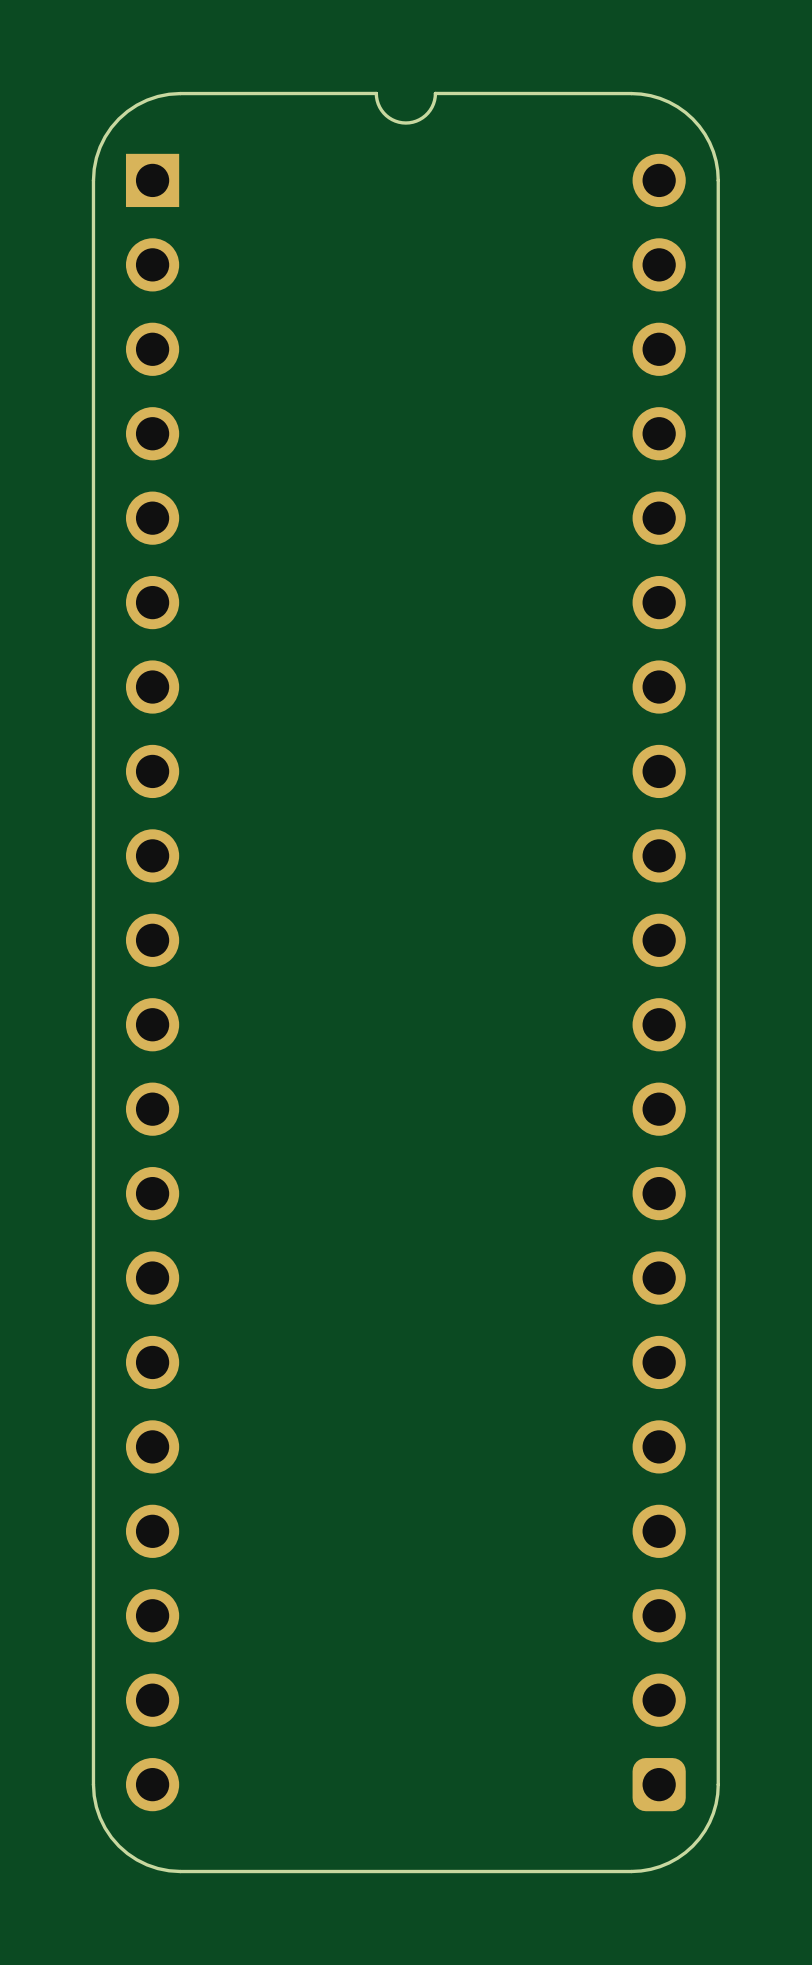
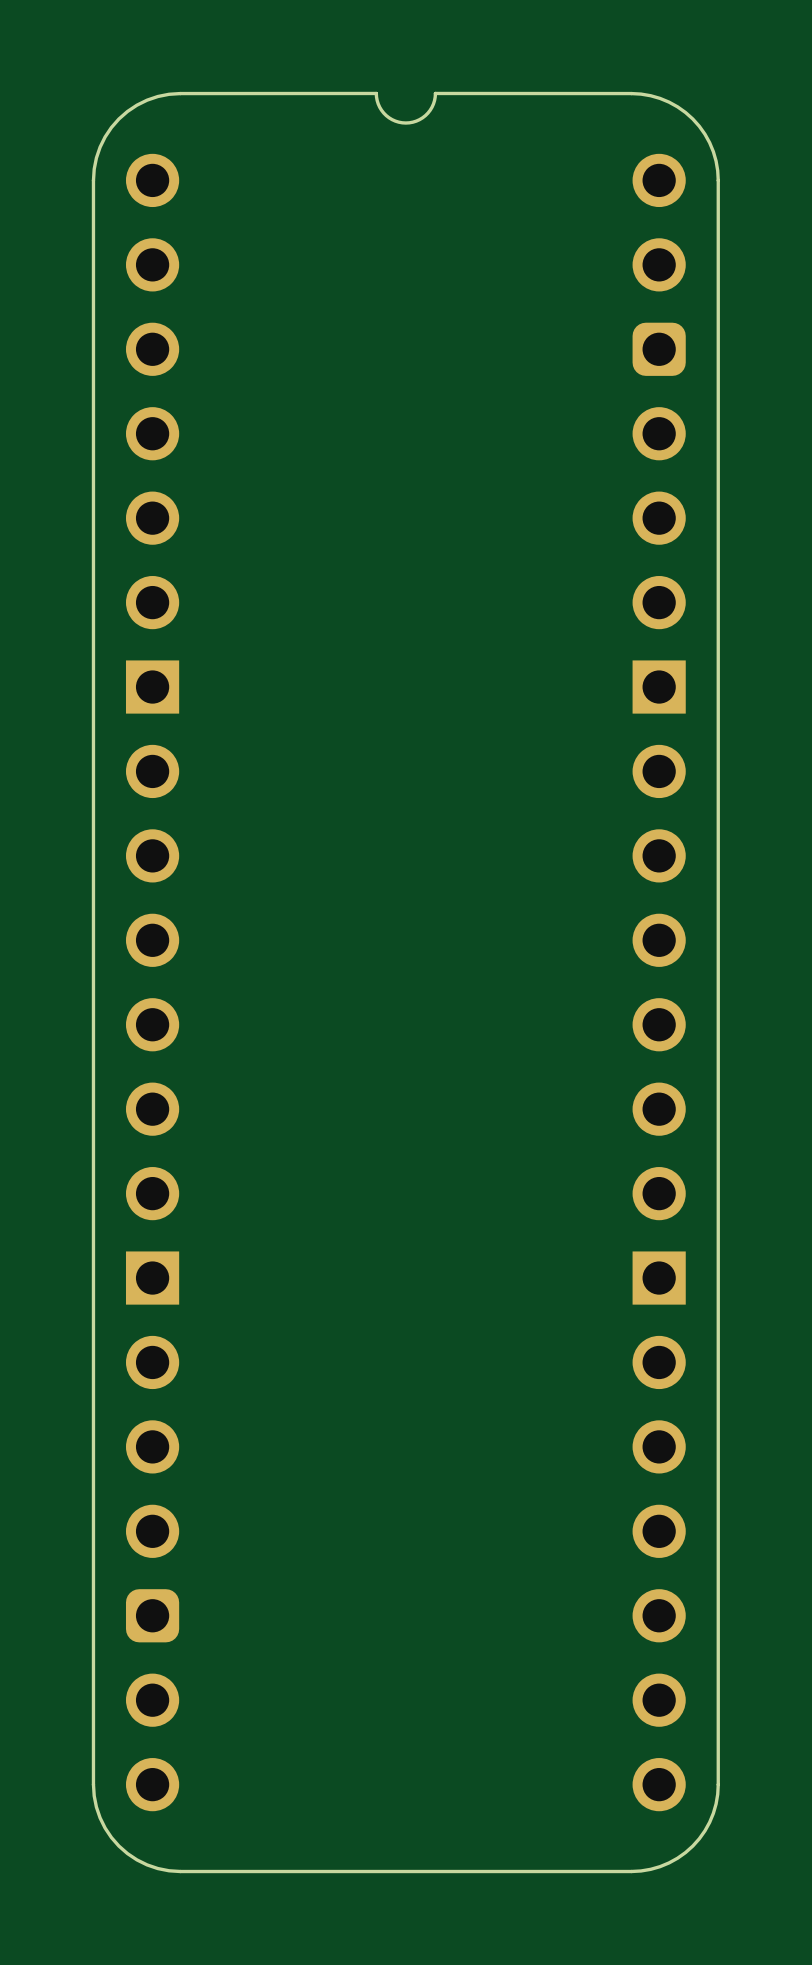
part footprint: [91, 91, 720, 1874] -> [91, 91, 720, 1874]

